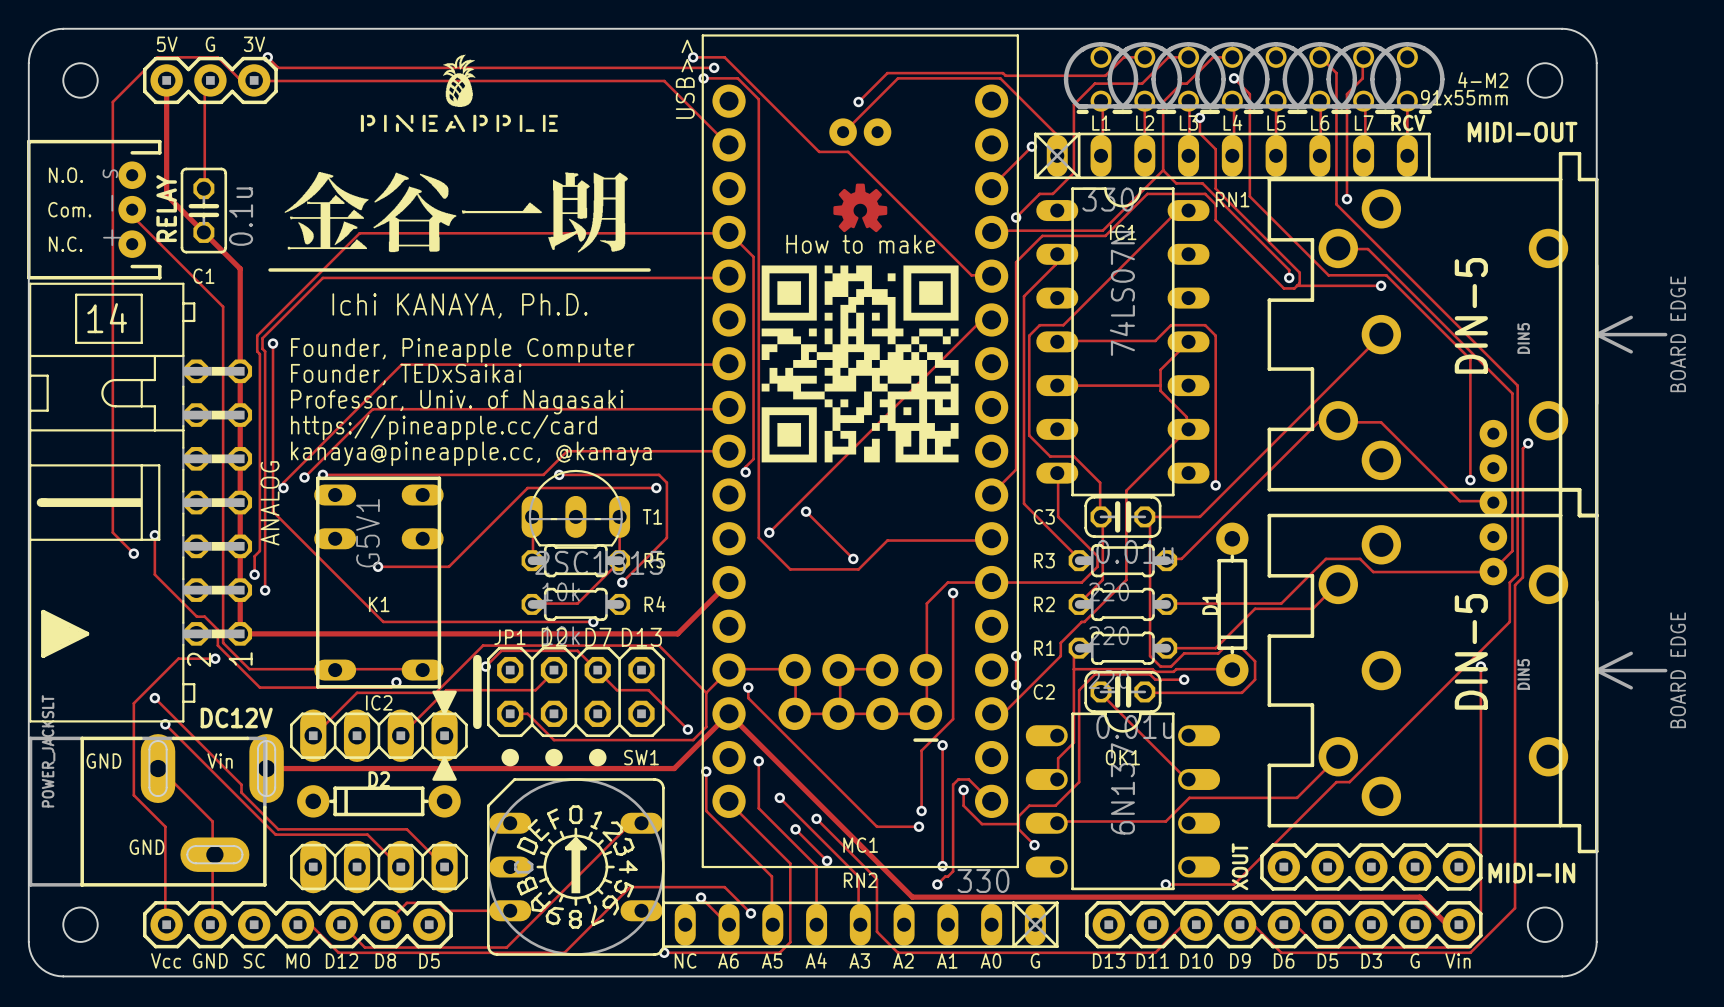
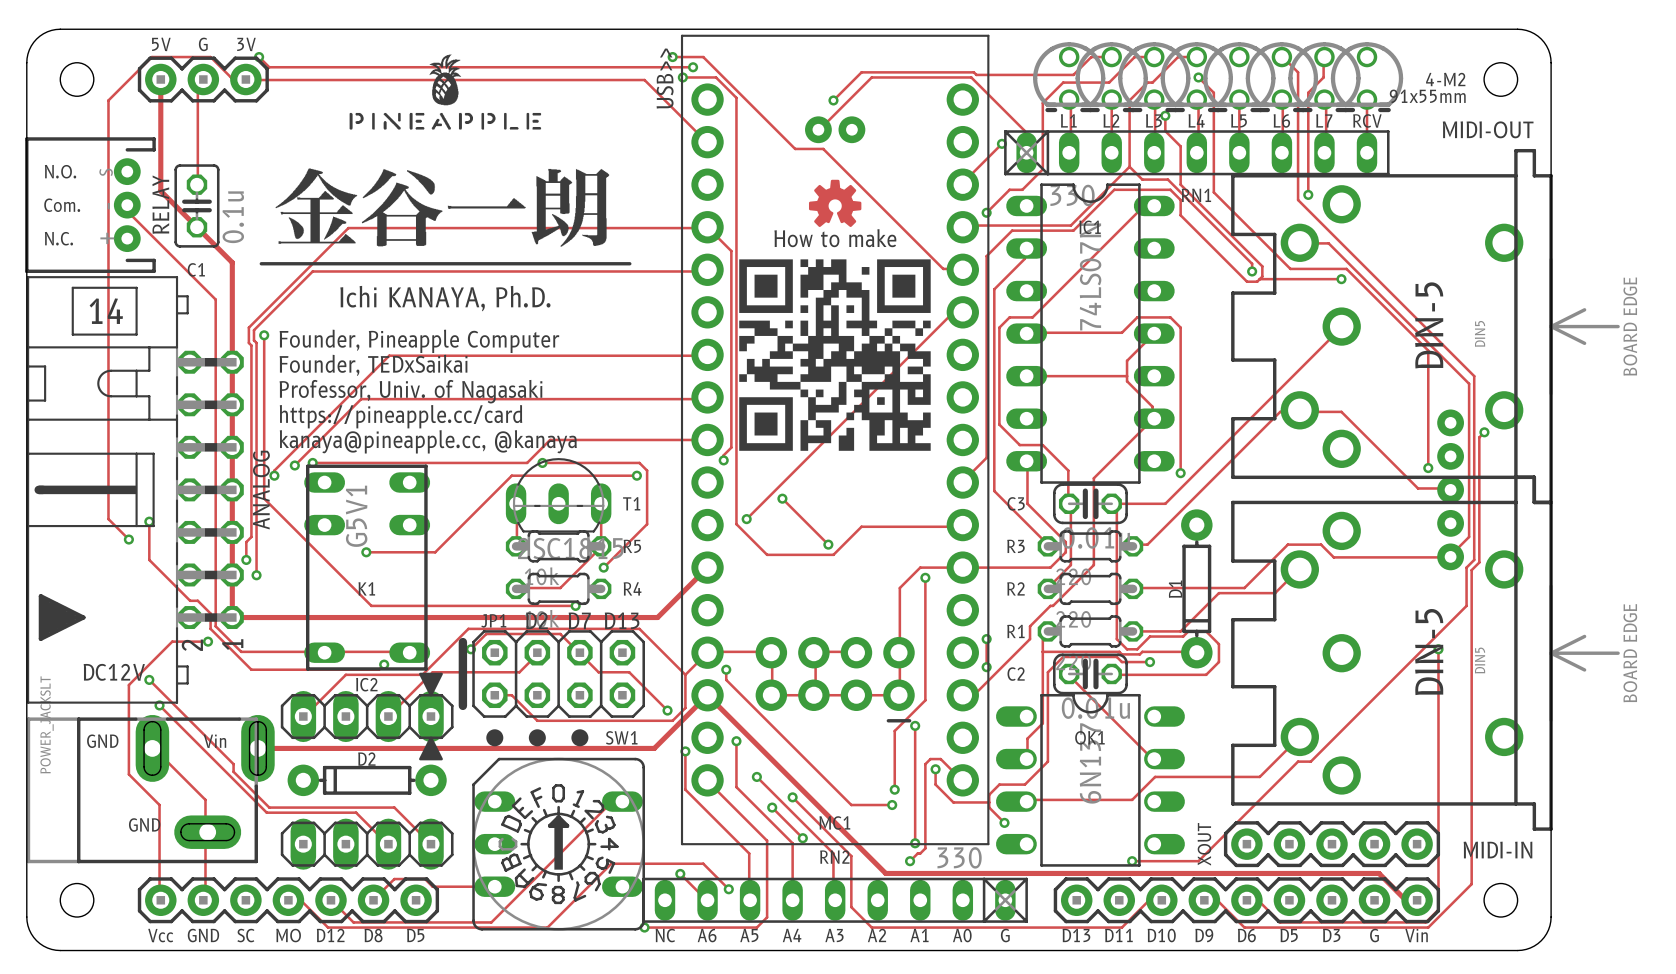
DC12V name position: DC12V (236, 717) -> DC12V (114, 672)

